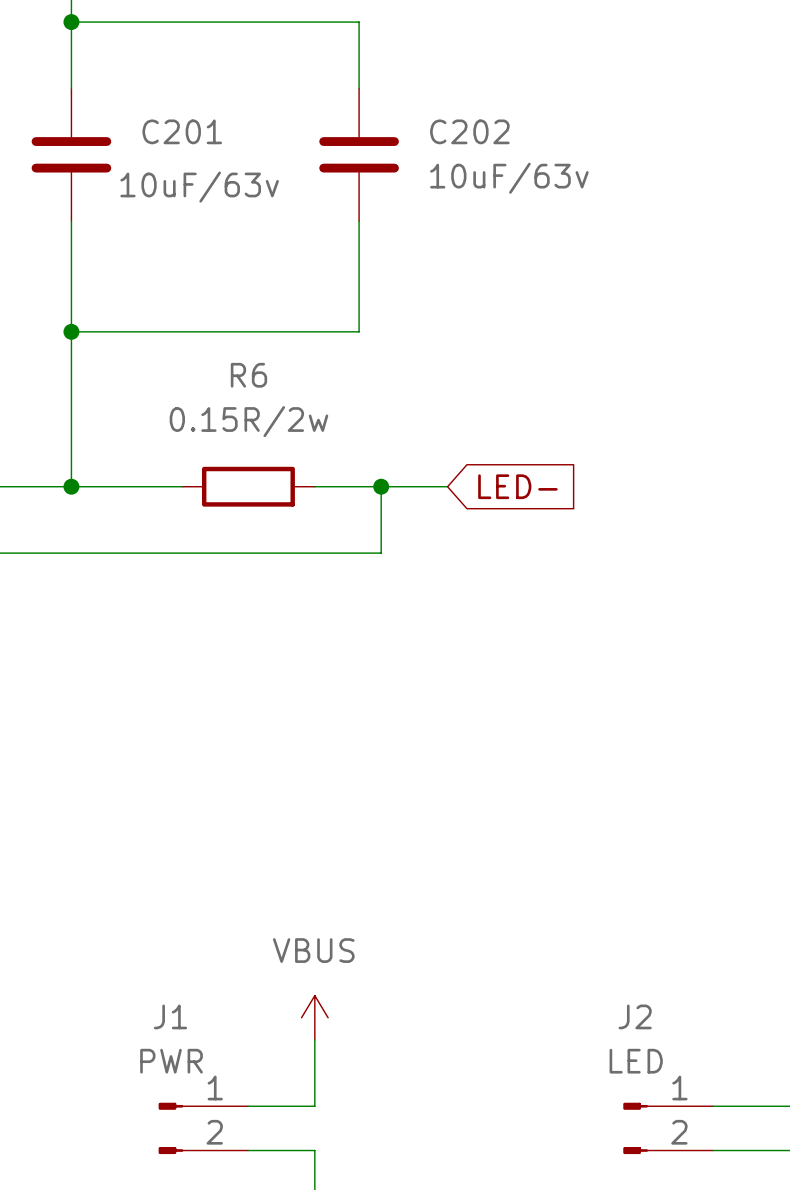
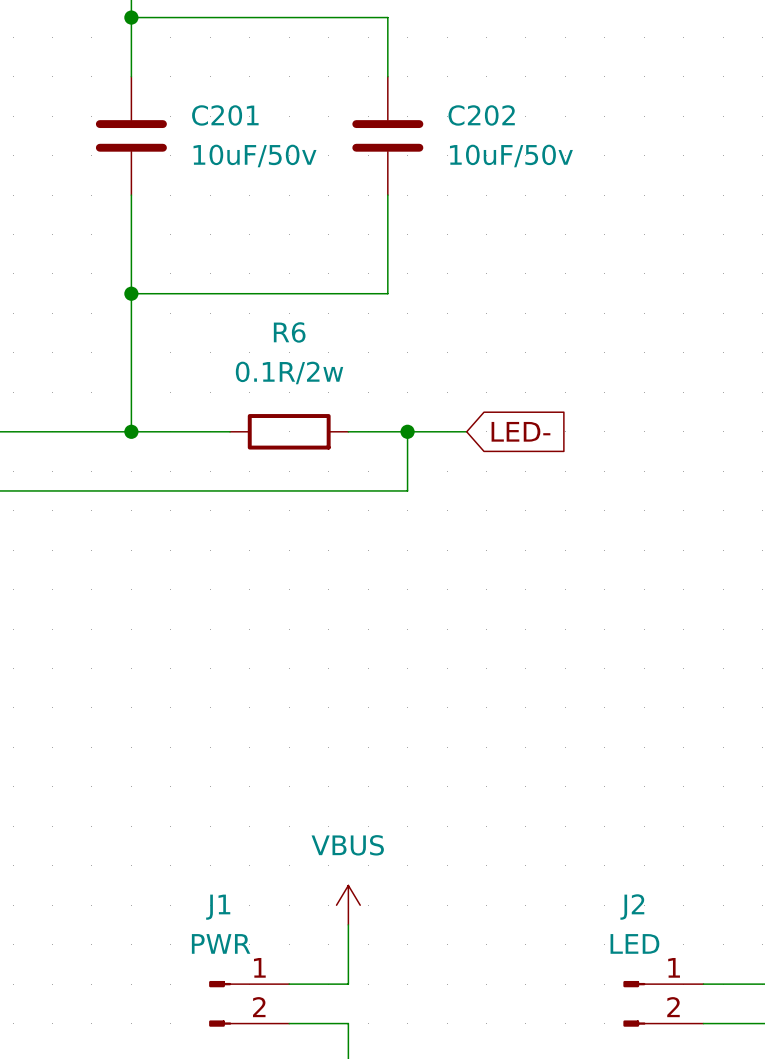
C202 value: 10uF/63v (509, 178) -> 10uF/50v (511, 155)
C201 value: 10uF/63v (199, 187) -> 10uF/50v (255, 155)
R6 value: 0.15R/2w (248, 421) -> 0.1R/2w (289, 372)

